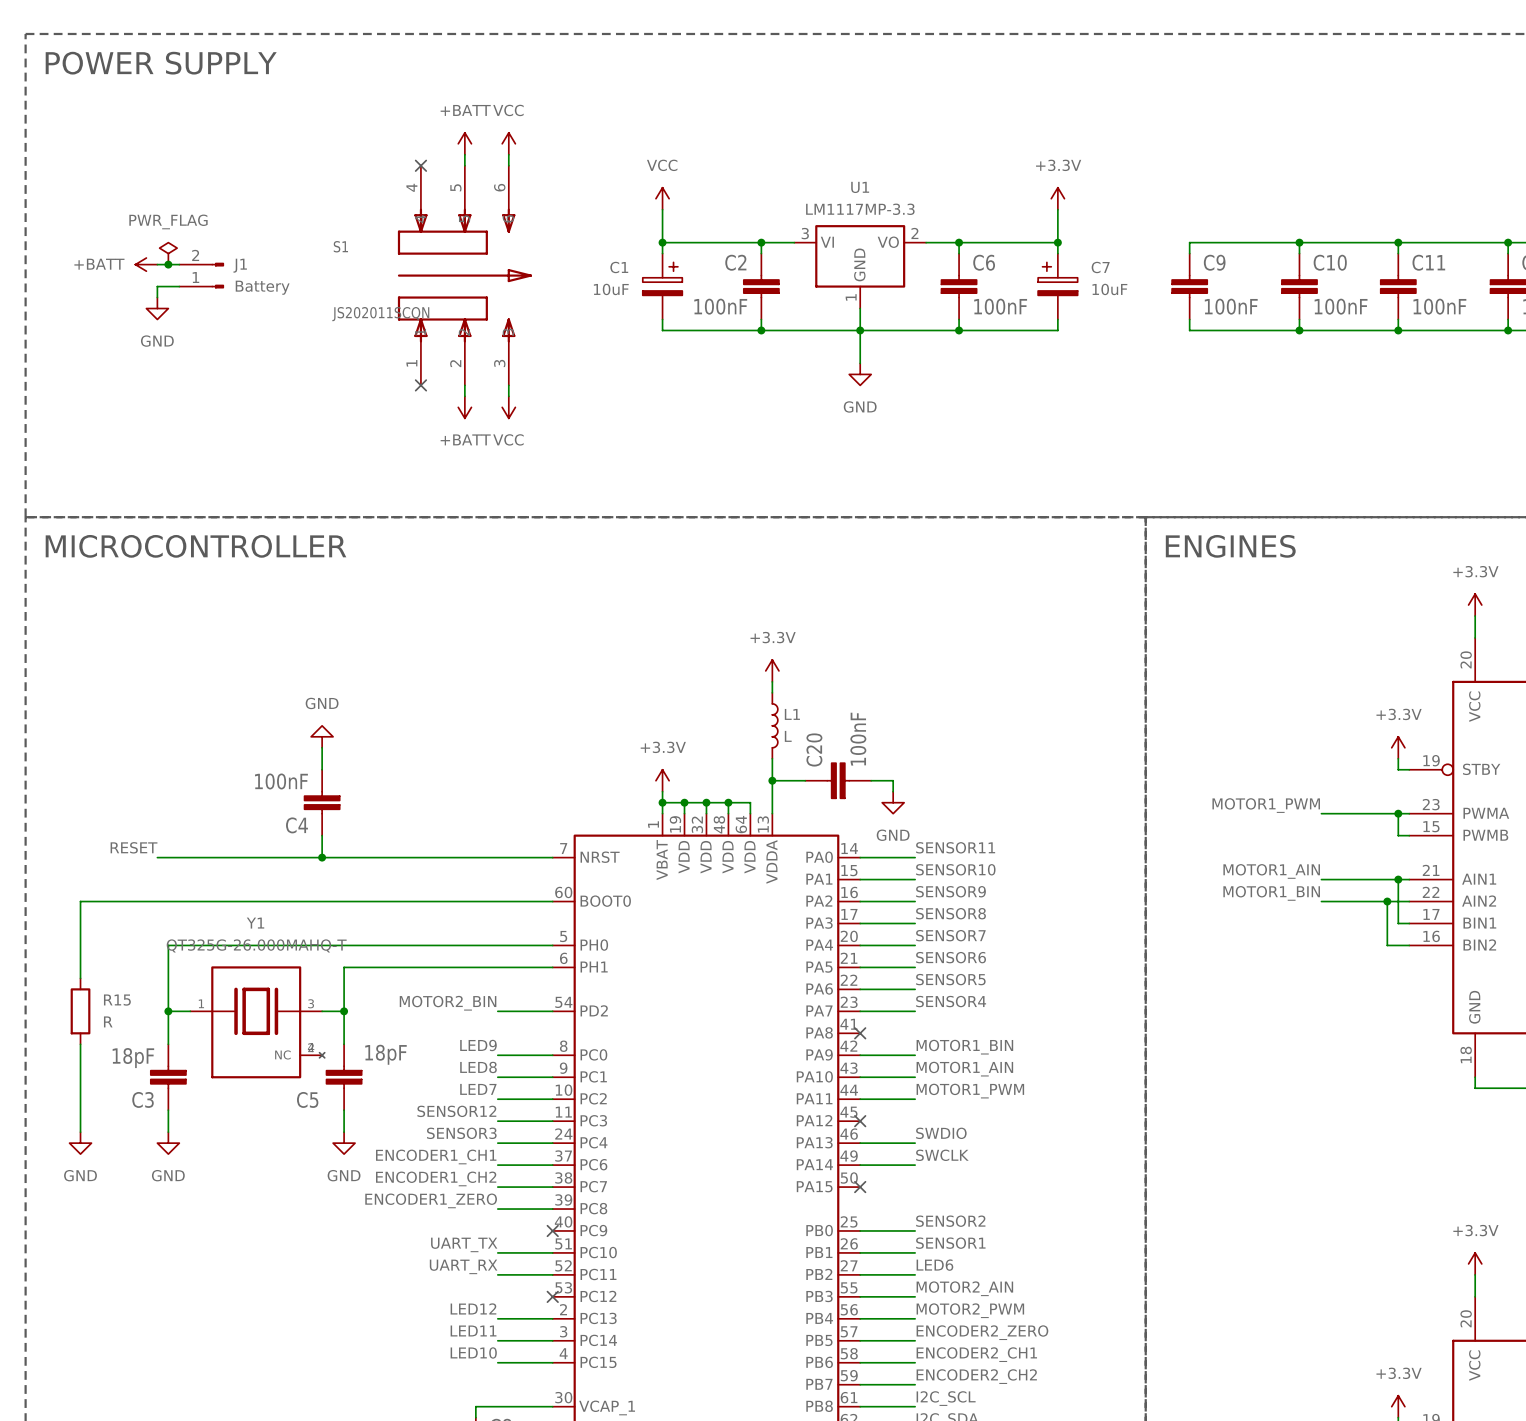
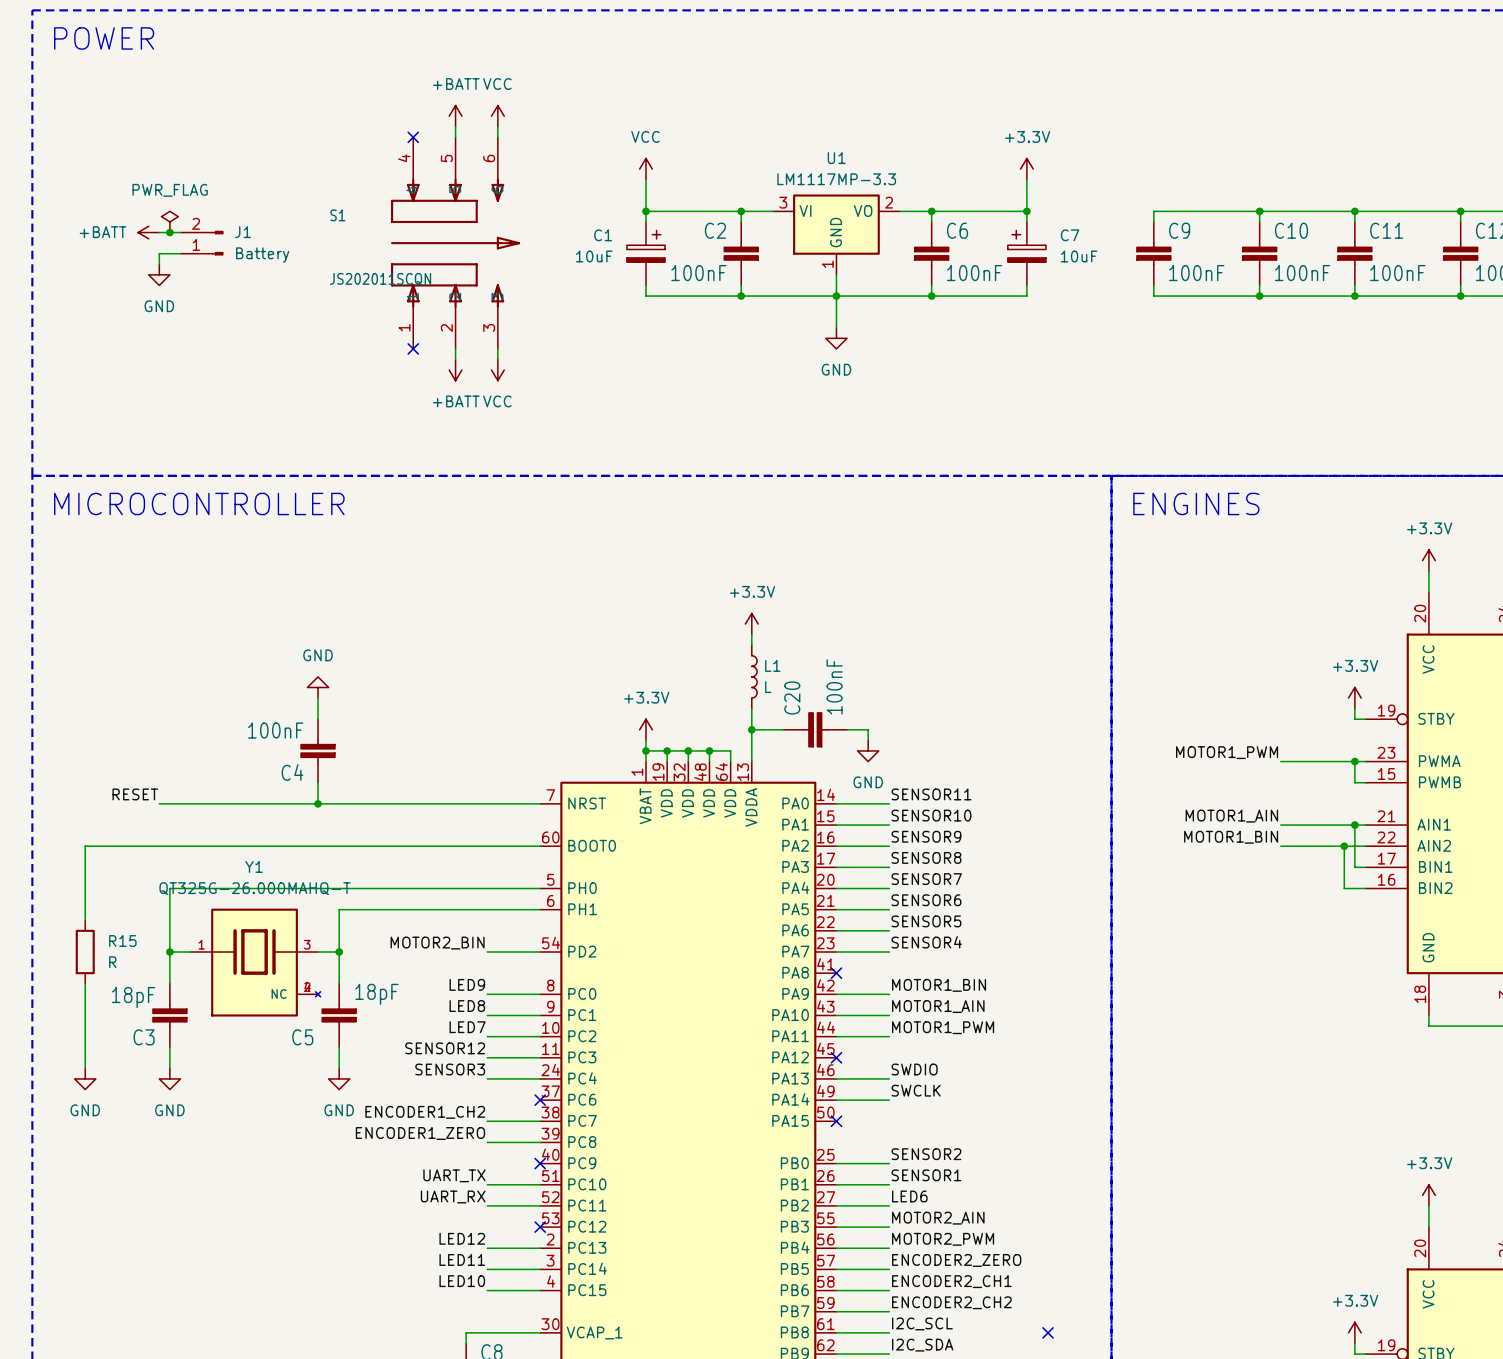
text: POWER SUPPLY (161, 63) -> POWER (104, 38)
label: ENCODER1_CH1 (436, 1156) -> none
wire: (497, 1165) (552, 1165) -> none
no-connect mark: none -> (540, 1100)
no-connect mark: none -> (1048, 1332)

